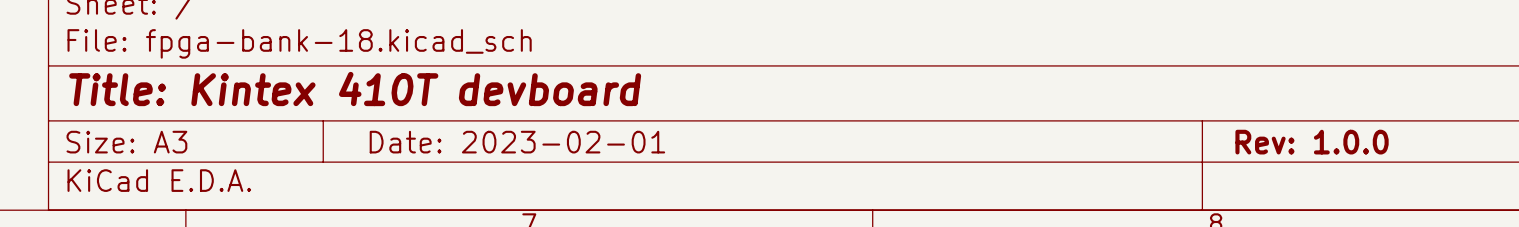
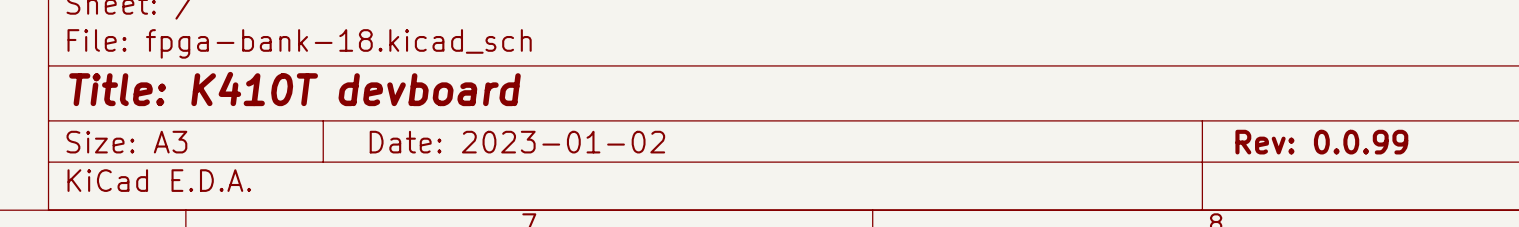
title block: Title: Kintex 410T devboard (355, 89) -> Title: K410T devboard (294, 89)
title block: Date: 2023-02-01 (517, 142) -> Date: 2023-01-02 (517, 142)
title block: Rev: 1.0.0 (1312, 142) -> Rev: 0.0.99 (1321, 142)

